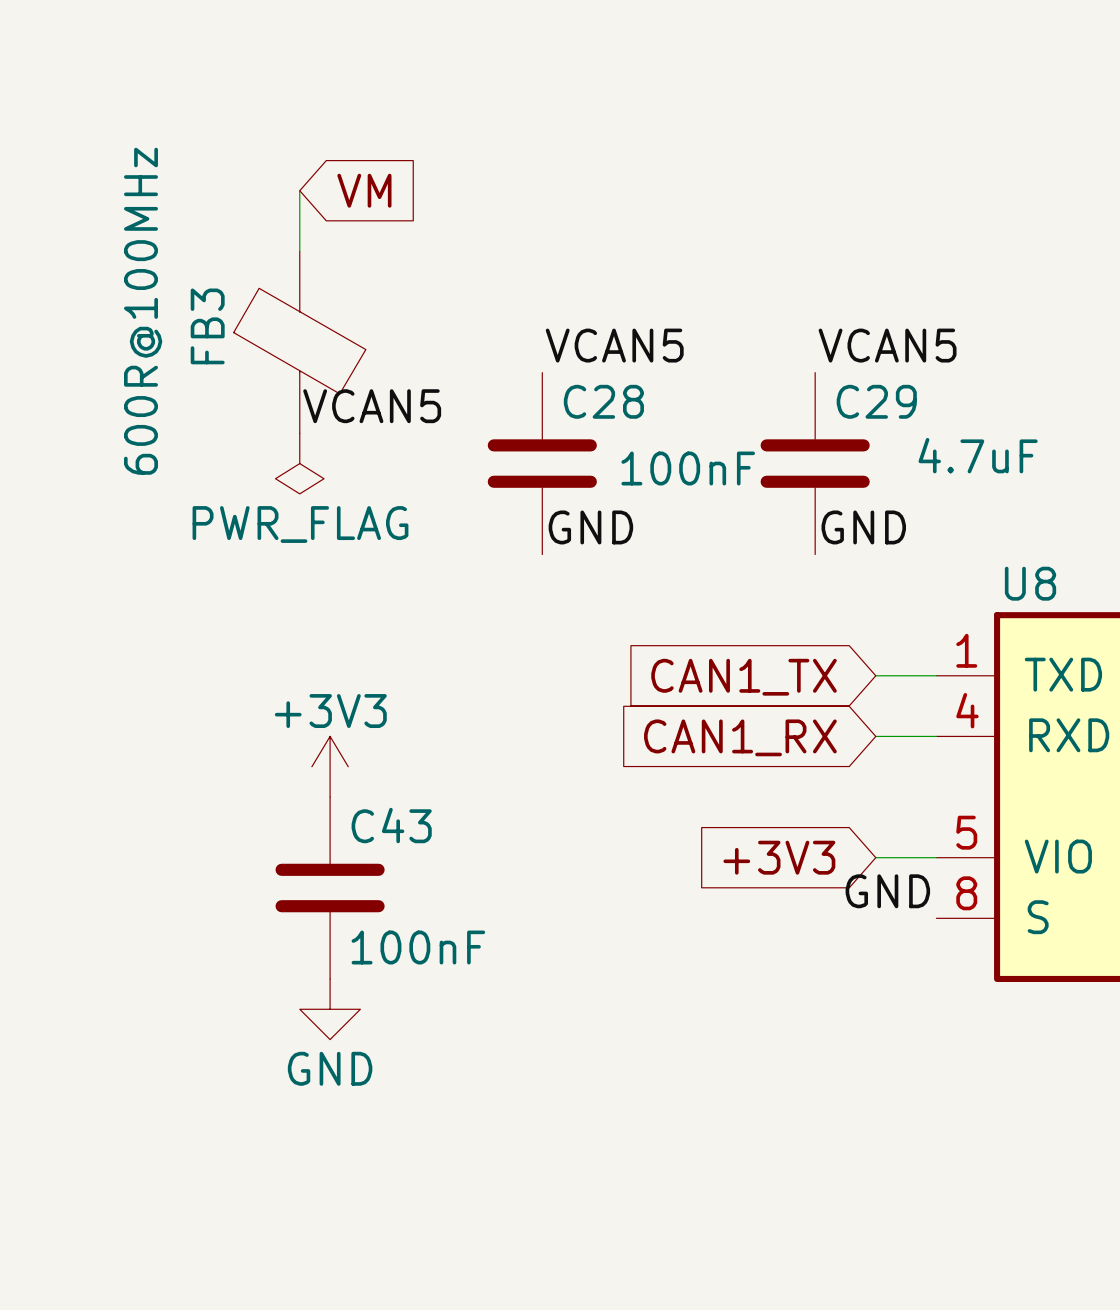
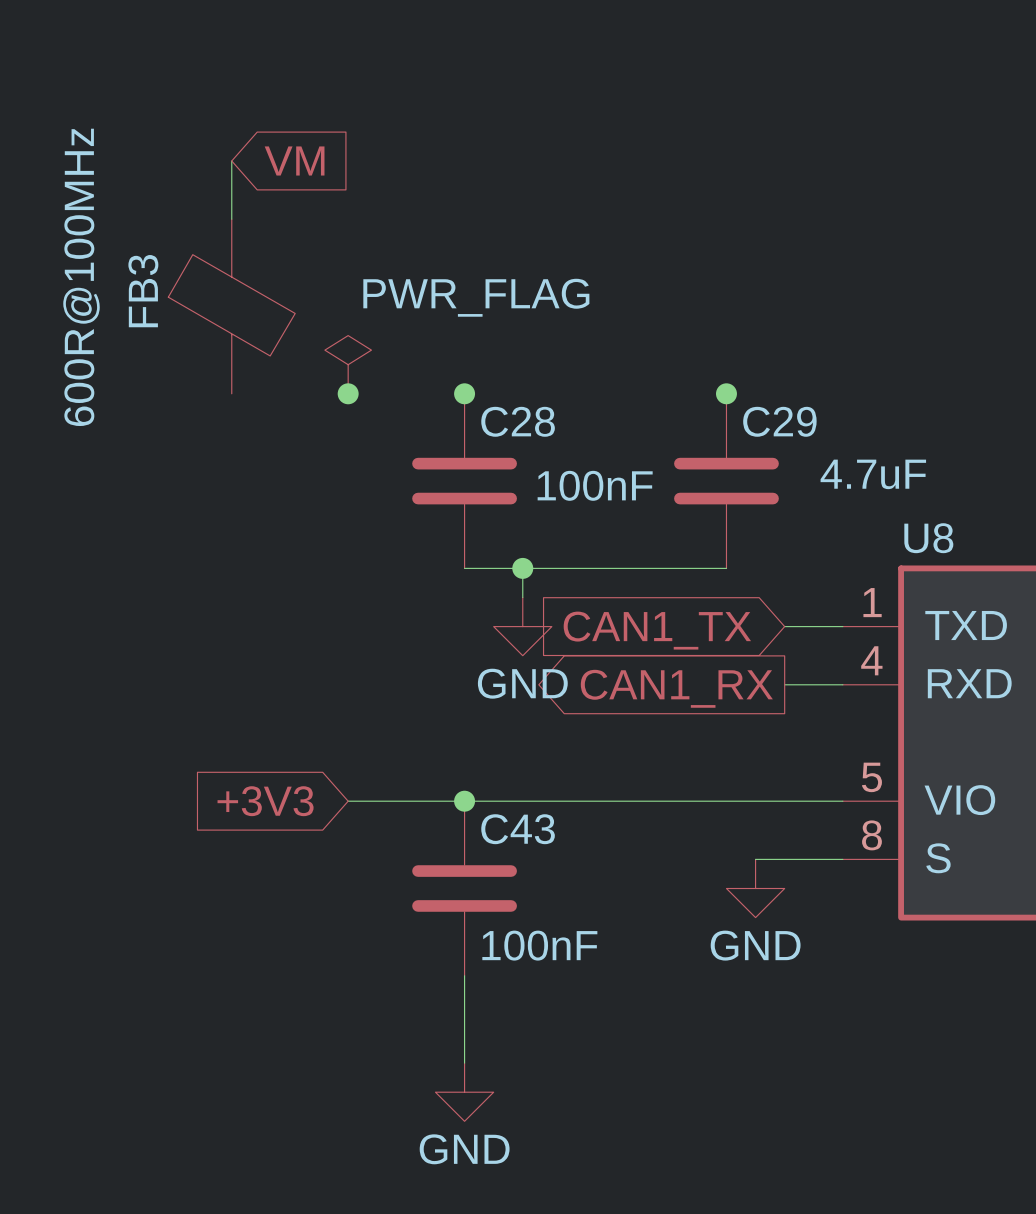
label: VCAN5 (614, 345) -> none
label: VCAN5 (887, 345) -> none
label: VCAN5 (372, 406) -> none
junction: none -> (348, 393)
junction: none -> (464, 393)
junction: none -> (726, 393)
power symbol rotation: 0° (299, 463) -> 180° (348, 364)
power symbol position: PWR_FLAG (299, 463) -> PWR_FLAG (348, 364)
C28 position: (542, 463) -> (464, 481)
C29 position: (815, 463) -> (726, 481)
power symbol text position: PWR_FLAG (300, 524) -> PWR_FLAG (476, 297)
label: GND (590, 527) -> none
label: GND (863, 527) -> none
wire: none -> (464, 568) (726, 568)
wire: none -> (522, 568) (522, 597)
junction: none -> (522, 568)
power symbol: none -> GND (522, 626)
global label shape: input (740, 737) -> output (676, 688)
power symbol: +3V3 (330, 766) -> none
wire: none -> (348, 801) (784, 801)
junction: none -> (464, 801)
global label position: +3V3 (779, 857) -> +3V3 (265, 801)
C43 position: (330, 888) -> (464, 888)
label: GND (887, 891) -> none
wire: none -> (755, 859) (842, 859)
power symbol: none -> GND (755, 888)
power symbol: GND (330, 1009) -> none
wire: none -> (464, 975) (464, 1063)
power symbol: none -> GND (464, 1092)

